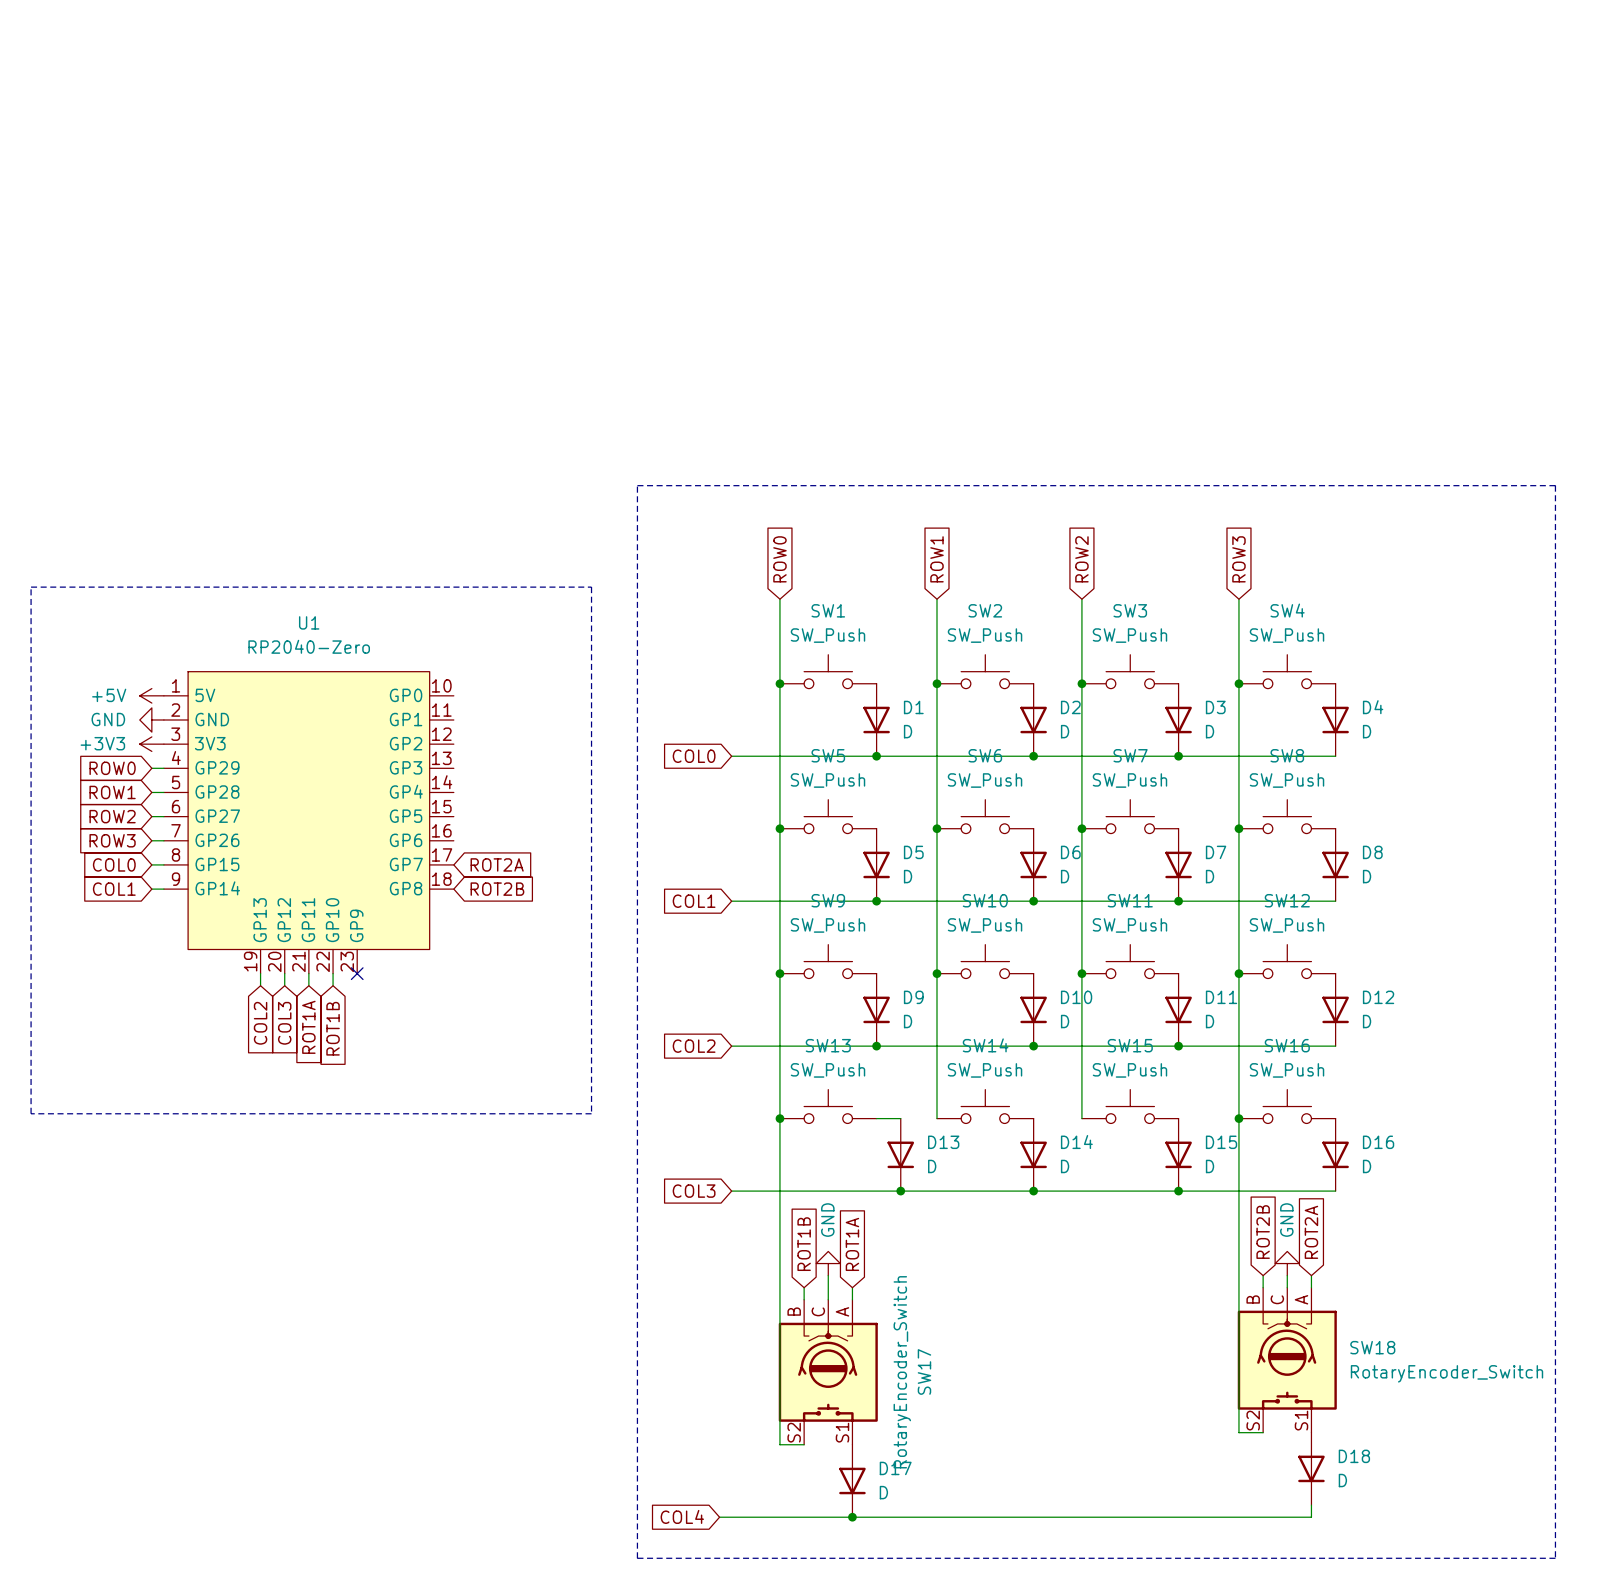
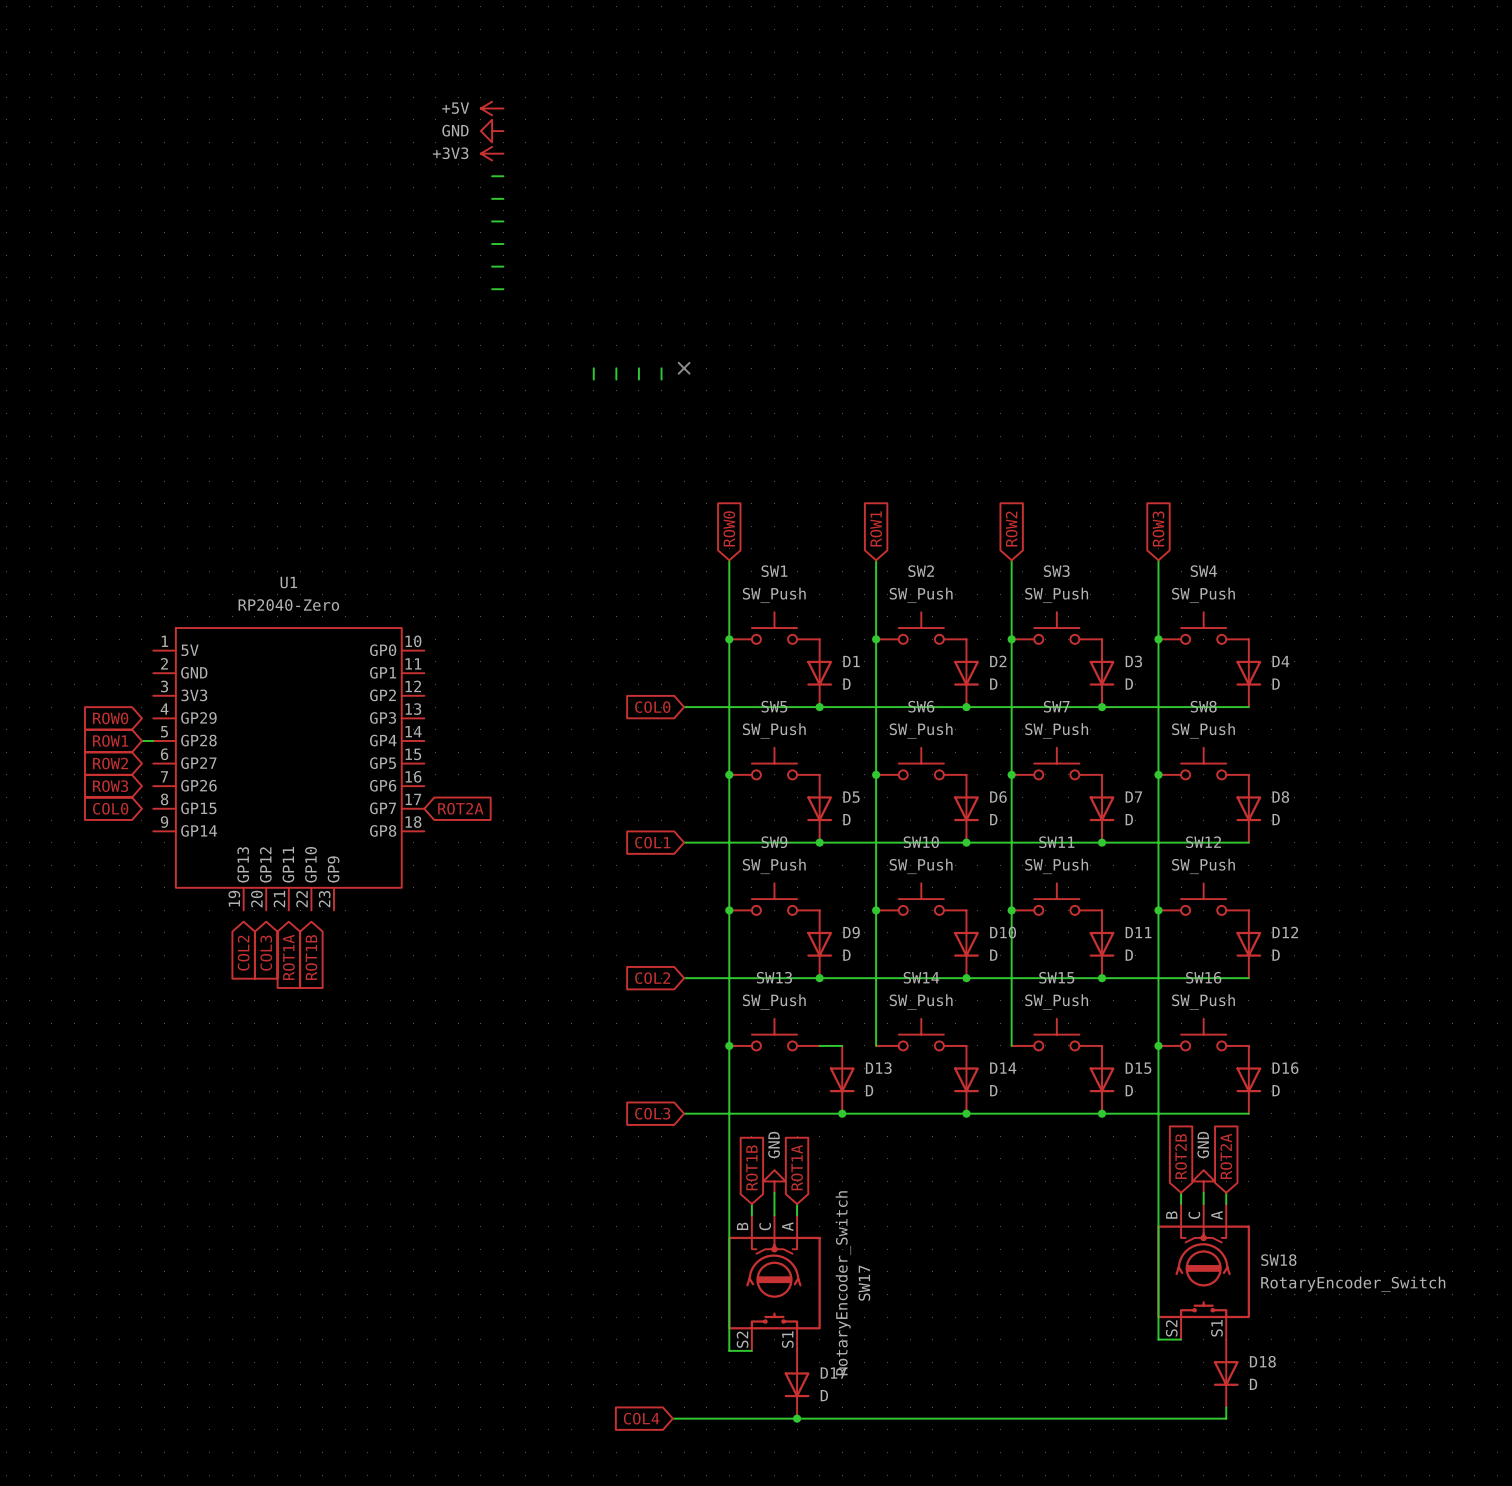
power symbol: none -> +5V (492, 108)
power symbol: none -> GND (492, 131)
power symbol: none -> +3V3 (492, 153)
wire: none -> (492, 176) (503, 176)
wire: none -> (492, 198) (503, 198)
wire: none -> (492, 221) (503, 221)
wire: none -> (492, 244) (503, 244)
wire: none -> (492, 266) (503, 266)
wire: none -> (492, 289) (503, 289)
wire: none -> (593, 368) (593, 379)
wire: none -> (616, 368) (616, 379)
wire: none -> (638, 368) (638, 379)
wire: none -> (661, 368) (661, 379)
no-connect mark: none -> (684, 368)
line: (637, 485) (1555, 485) (1555, 1558) (637, 1558) (637, 485) -> none
line: (31, 587) (591, 587) (591, 1113) (31, 1113) (31, 587) -> none
power symbol: +5V (151, 695) -> none
power symbol: GND (151, 719) -> none
power symbol: +3V3 (151, 744) -> none
wire: (151, 768) (163, 768) -> none
wire: (151, 816) (163, 816) -> none
wire: (151, 840) (163, 840) -> none
wire: (151, 864) (163, 864) -> none
global label: COL1 (114, 889) -> none
wire: (151, 889) (163, 889) -> none
global label: ROT2B (497, 889) -> none
wire: (260, 973) (260, 985) -> none
wire: (284, 973) (284, 985) -> none
wire: (308, 973) (308, 985) -> none
wire: (333, 973) (333, 985) -> none
no-connect mark: (357, 973) -> none

